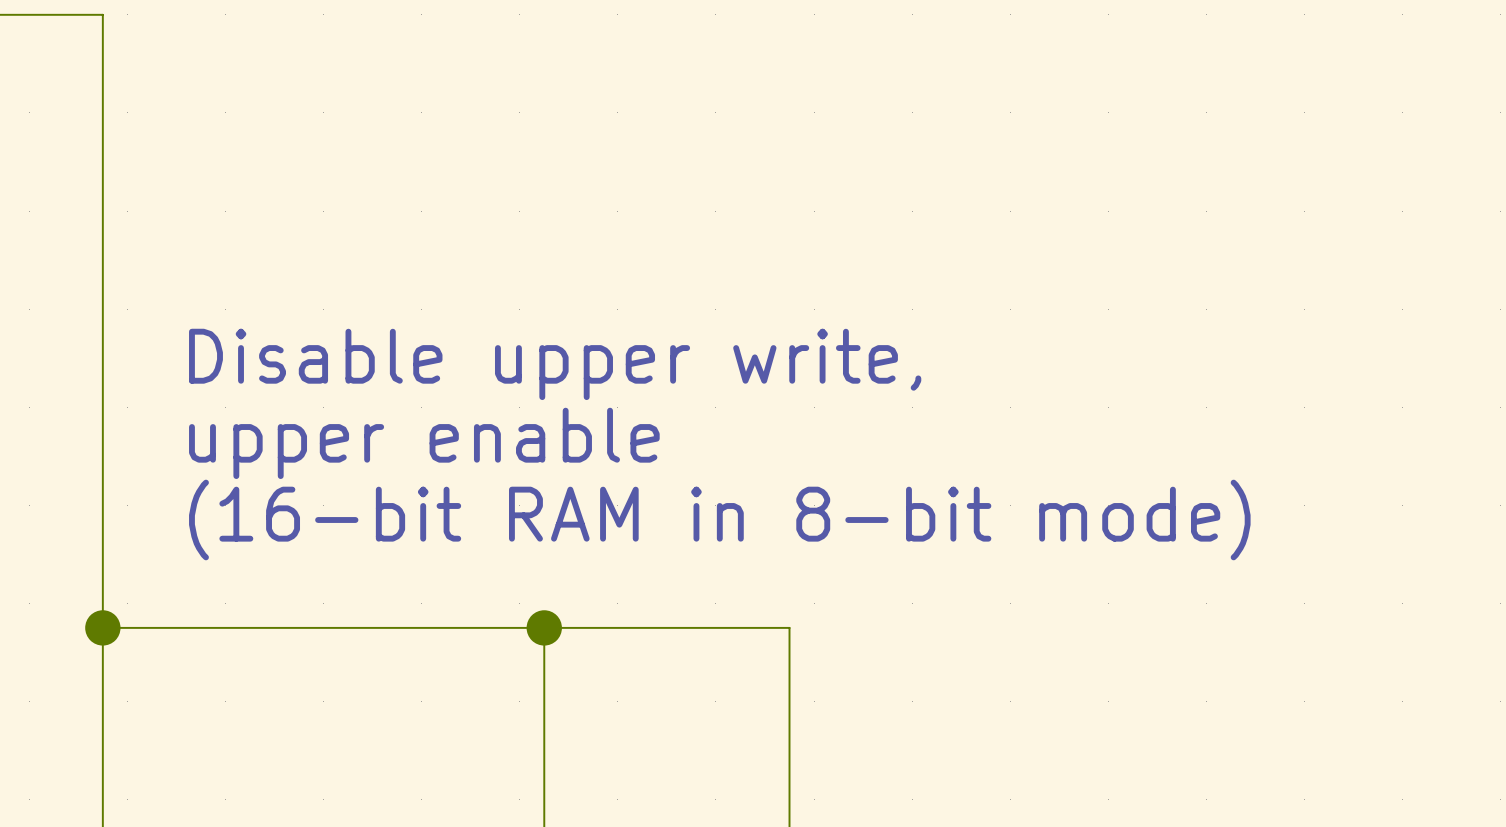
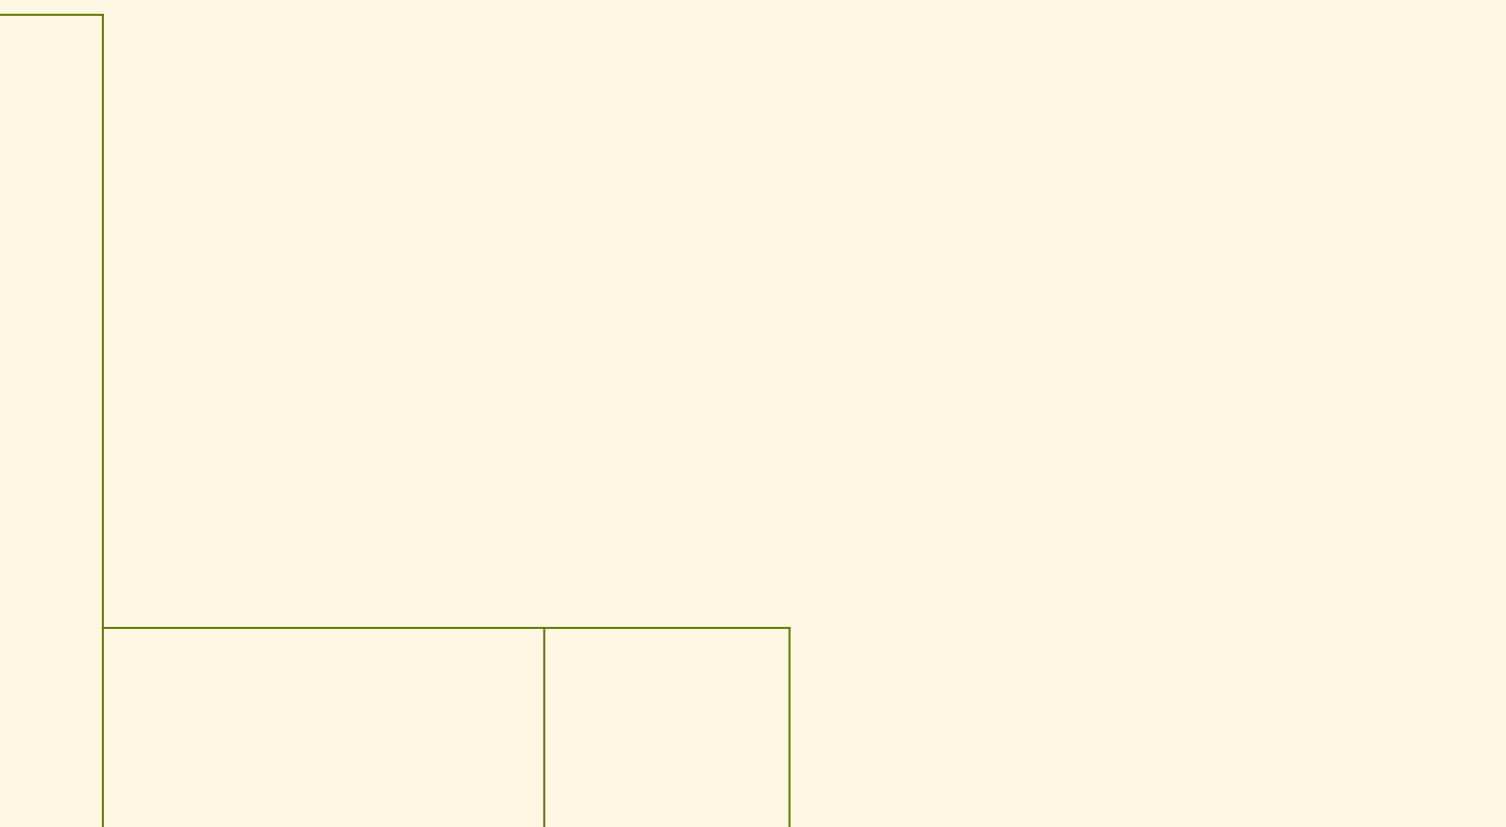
text: Disable upper write, (555, 364) -> none
text: upper enable (424, 443) -> none
text: (16-bit RAM in 8-bit mode) (719, 519) -> none
junction: (102, 627) -> none
junction: (544, 627) -> none

